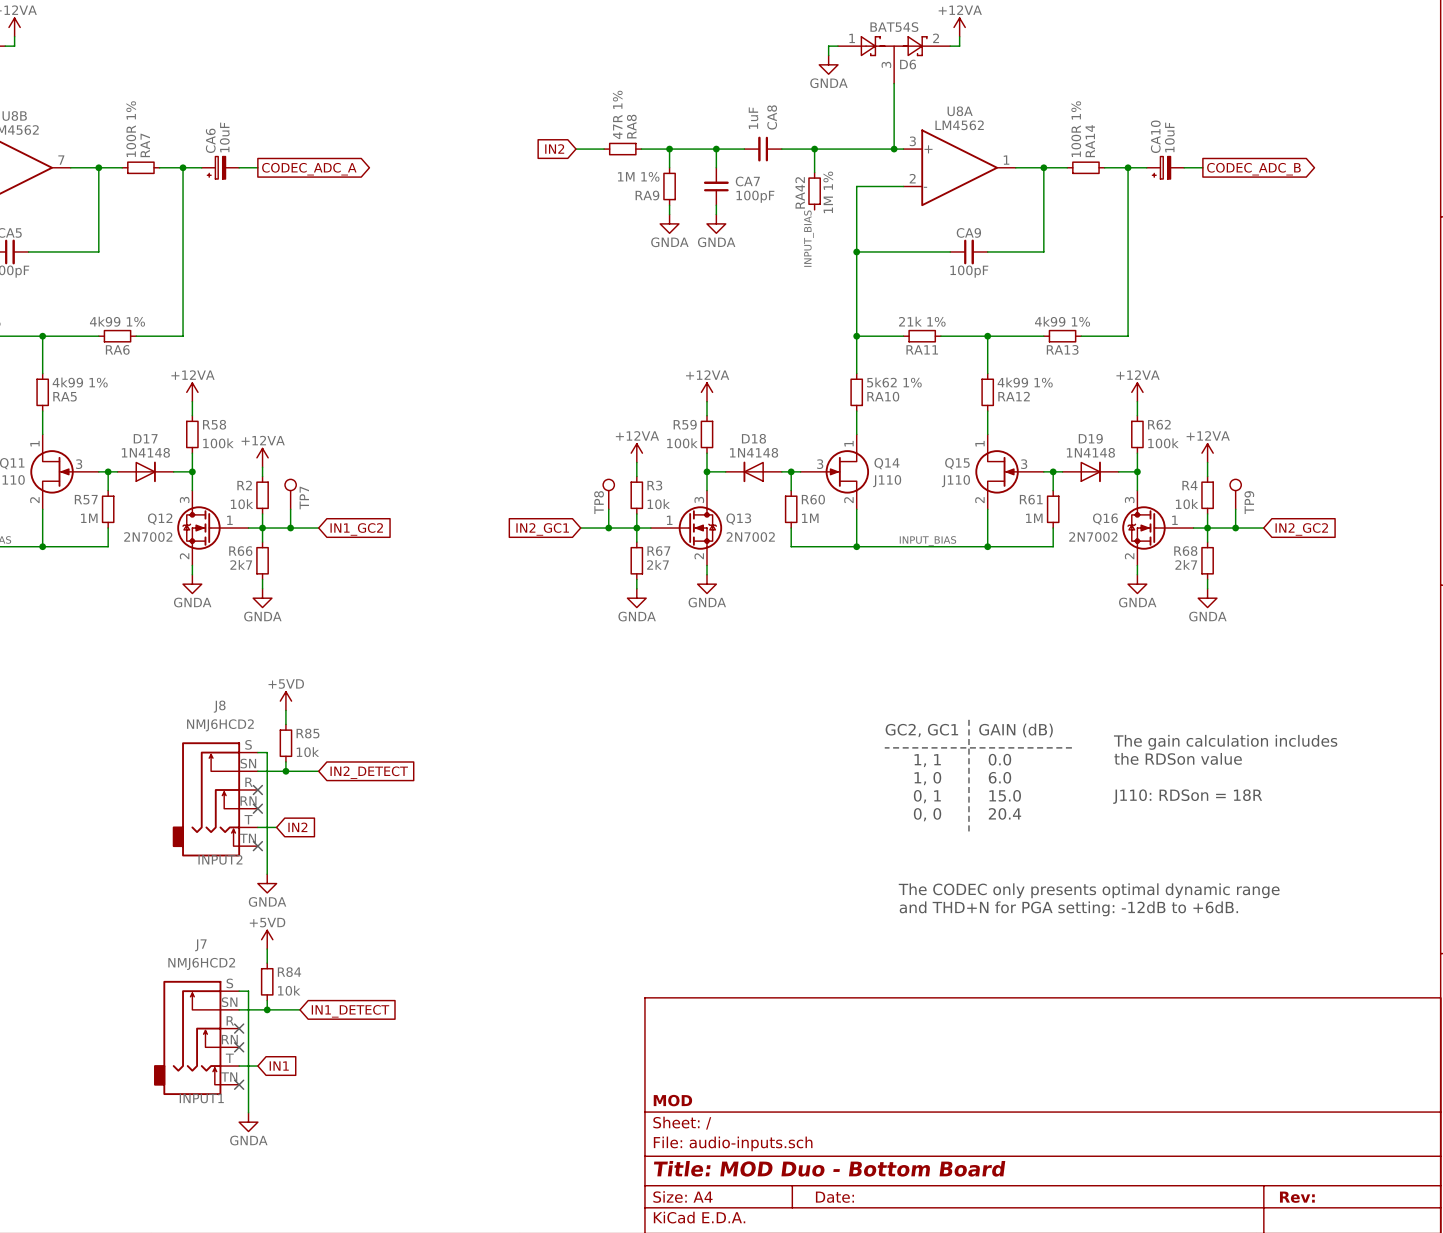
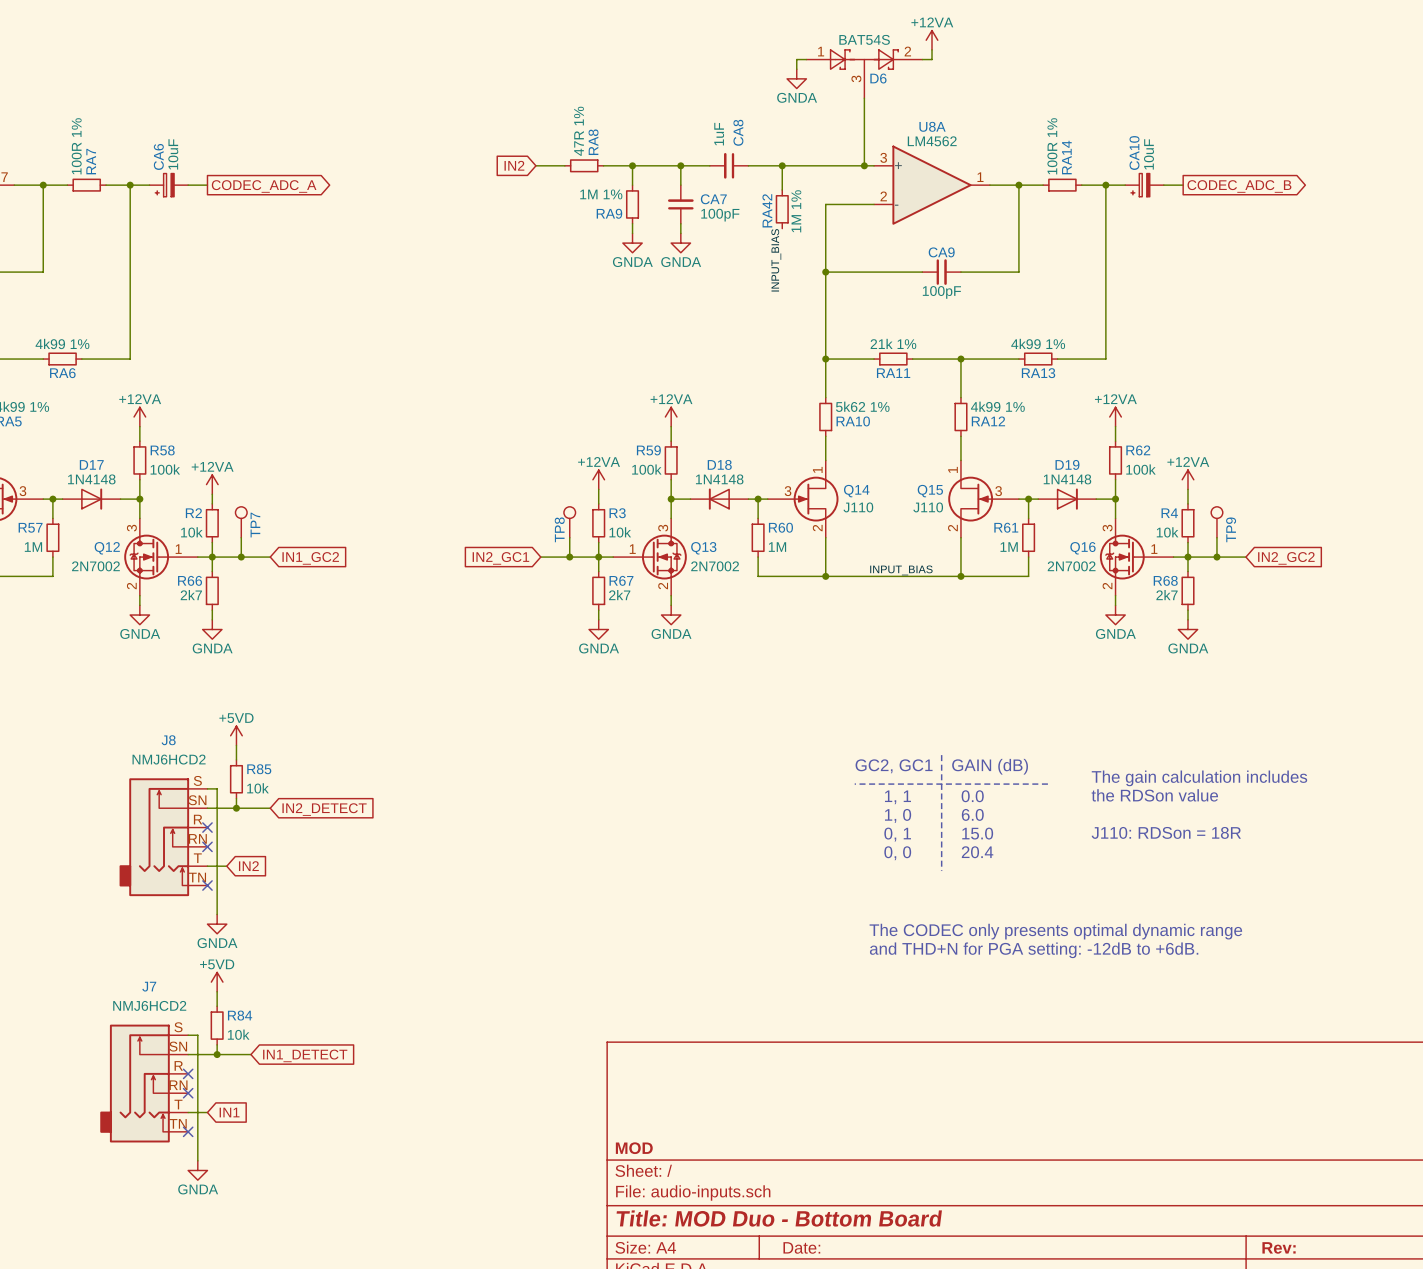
J8 text: INPUT2 (220, 859) -> none
J7 text: INPUT1 (201, 1098) -> none

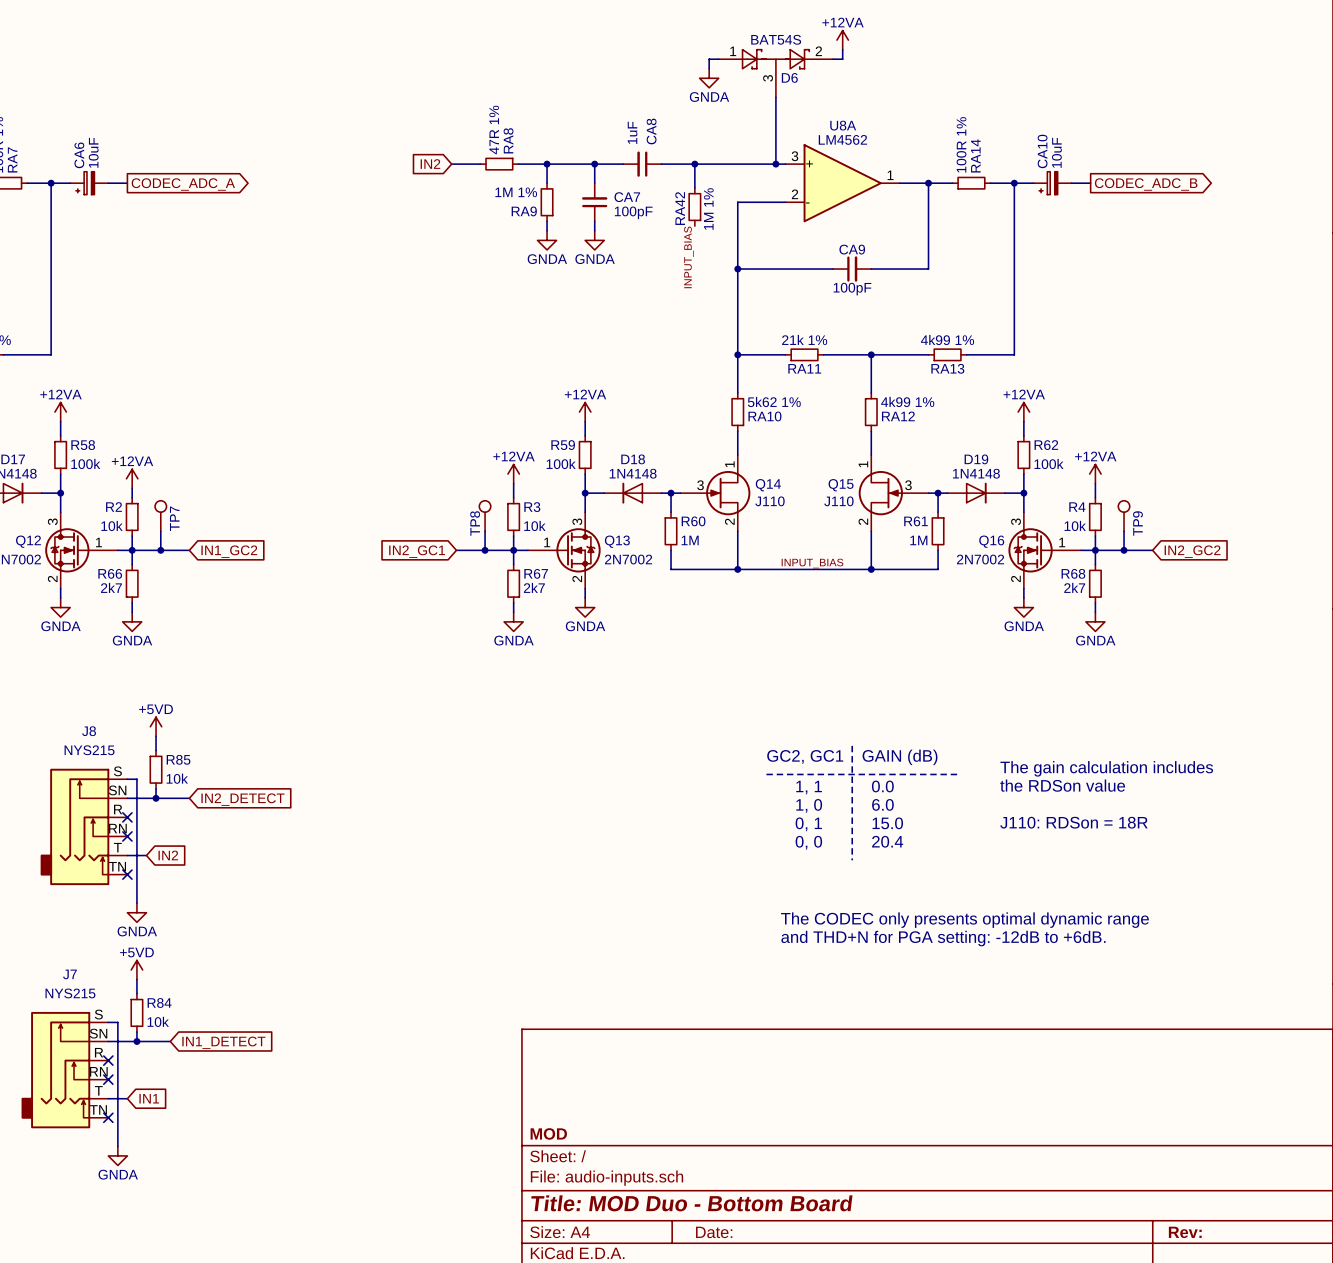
J8 value: NMJ6HCD2 (169, 759) -> NYS215 (89, 750)
J7 value: NMJ6HCD2 (149, 1005) -> NYS215 (70, 993)

